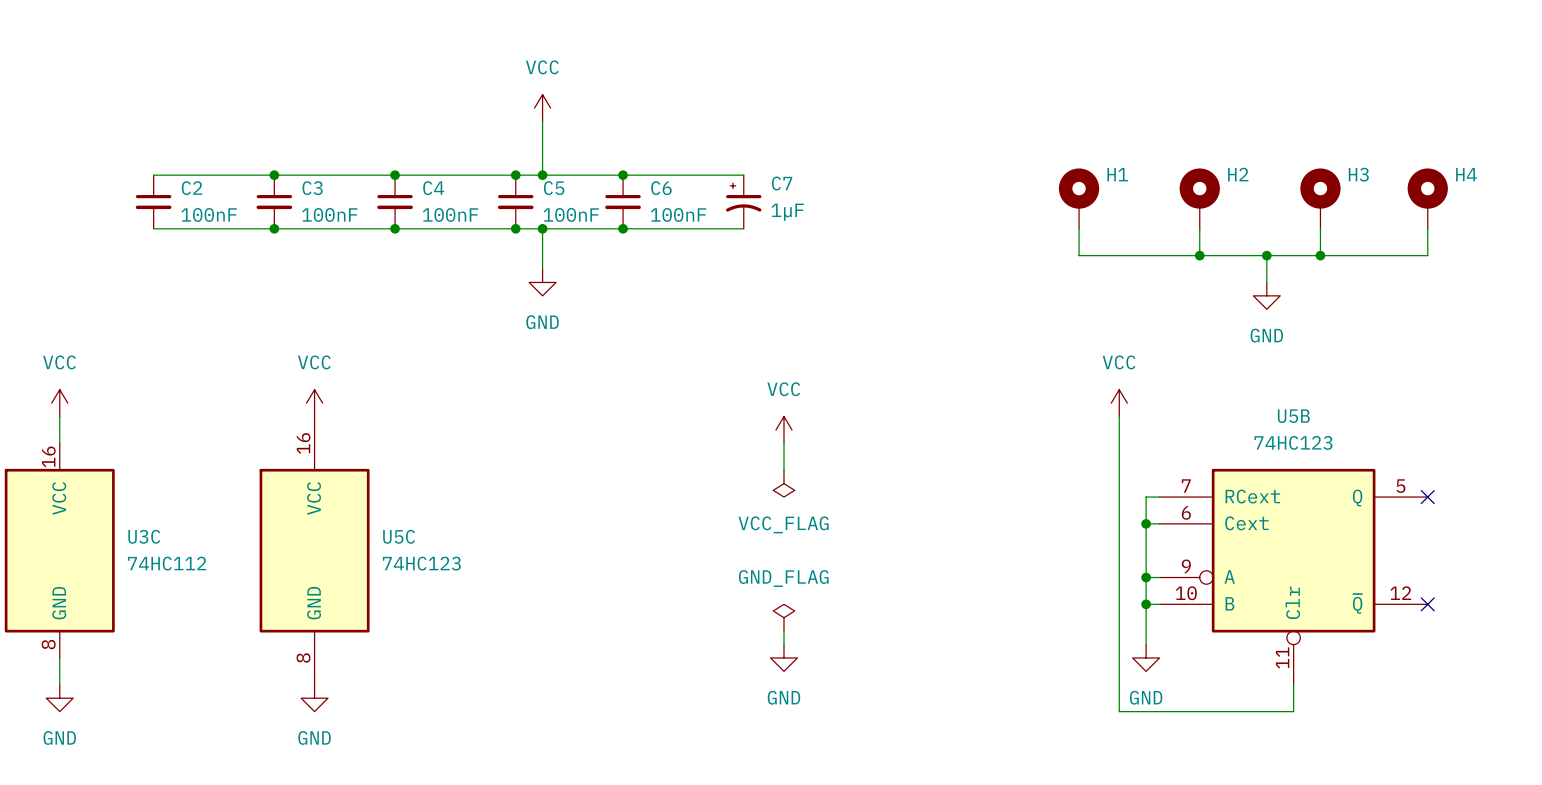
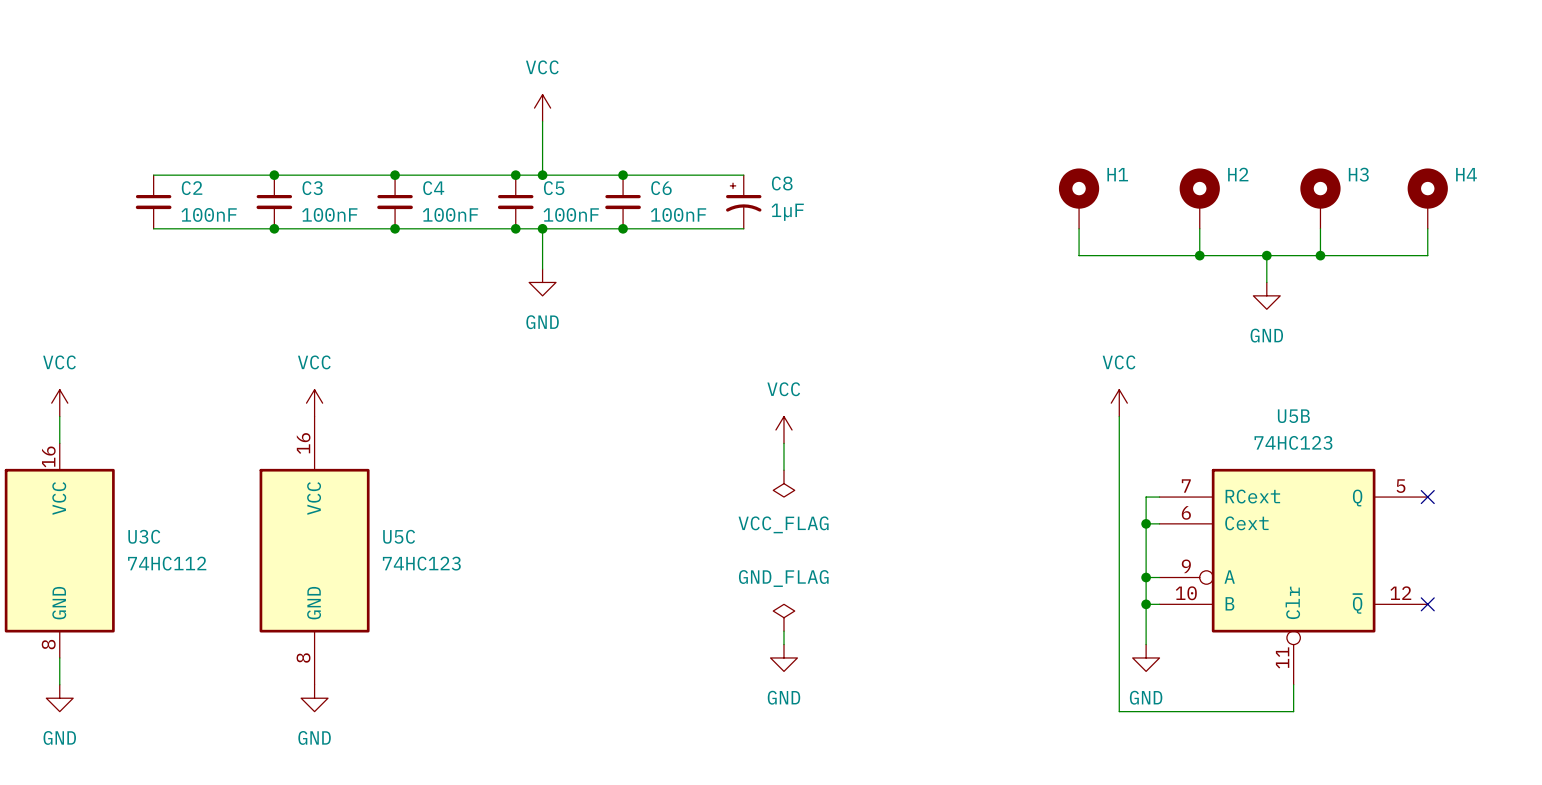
C7 name: C7 (782, 183) -> C8 (782, 183)

